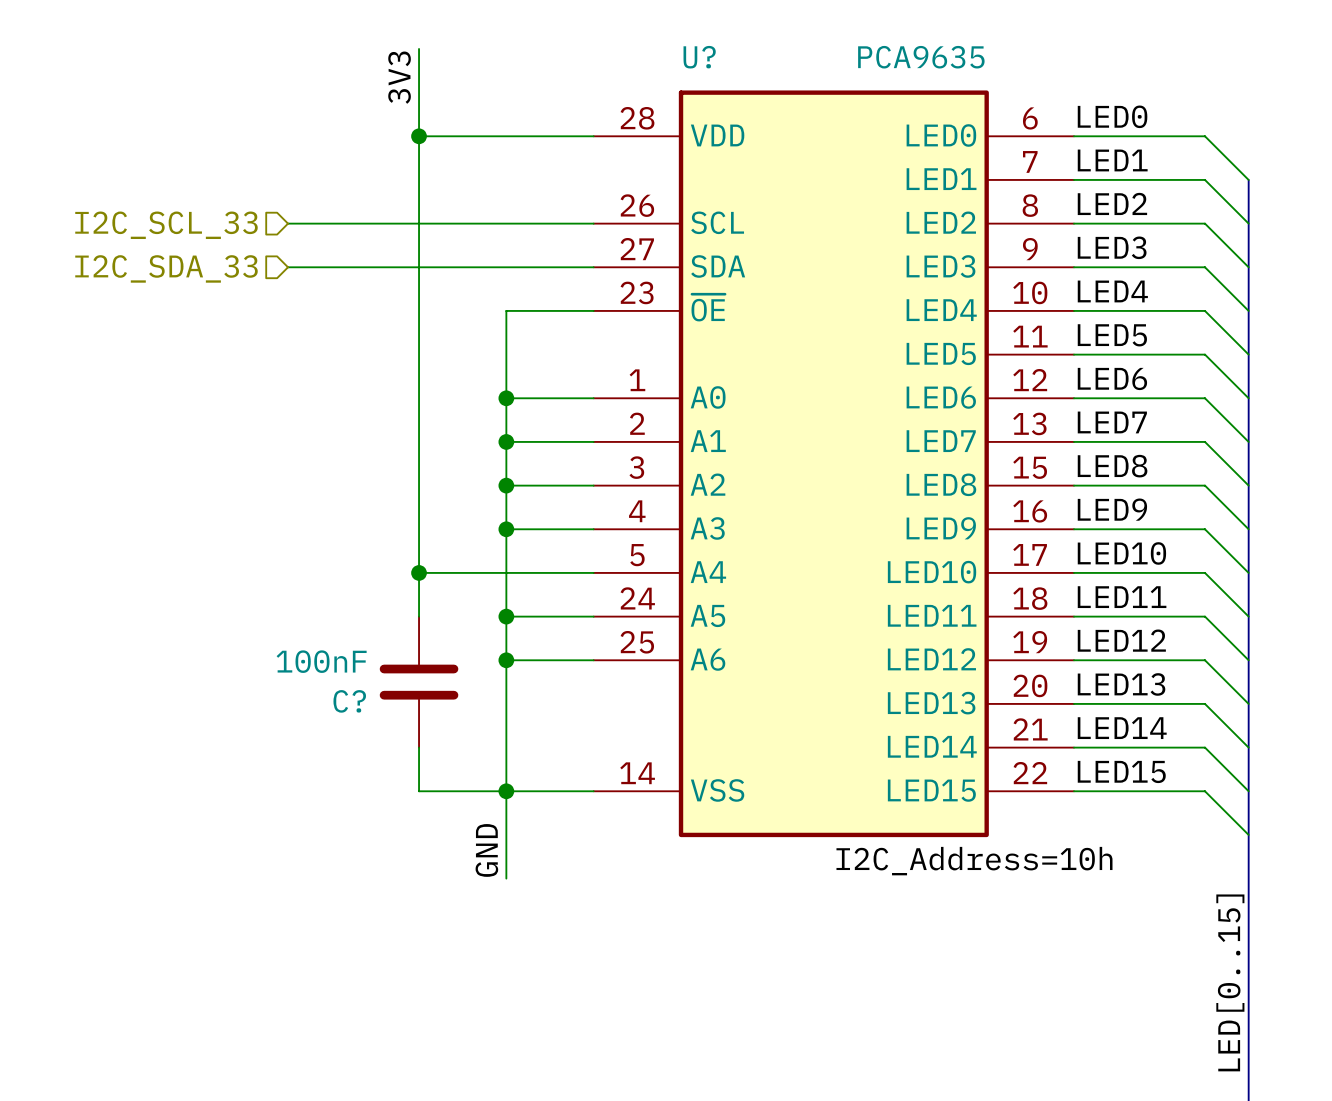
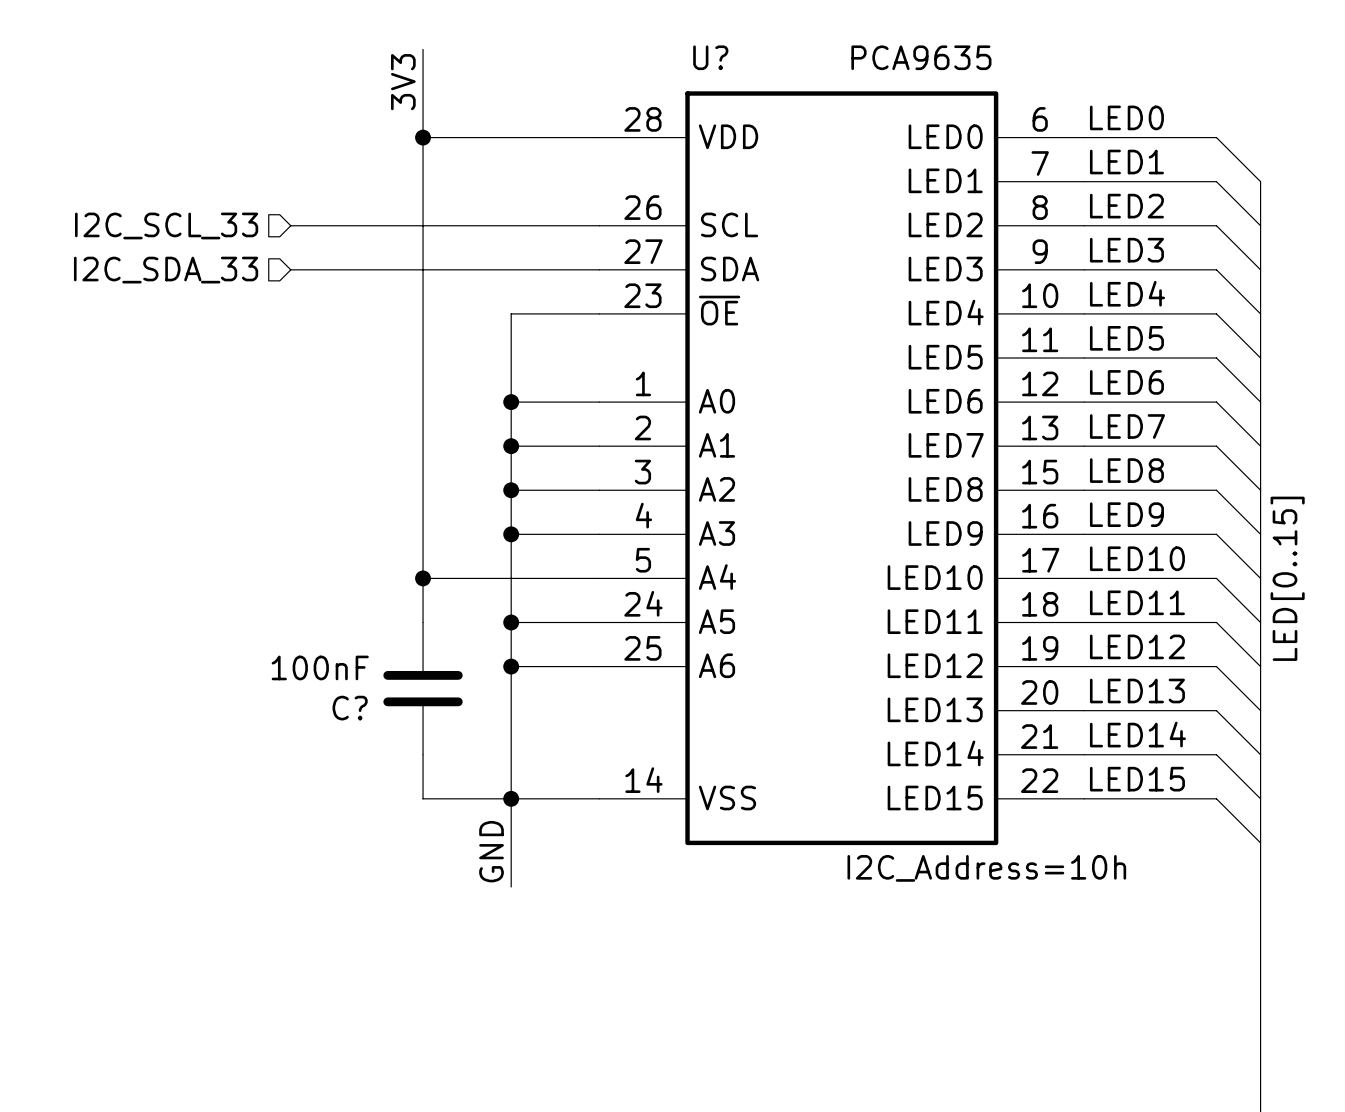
label position: LED[0..15] (1230, 982) -> LED[0..15] (1287, 578)

